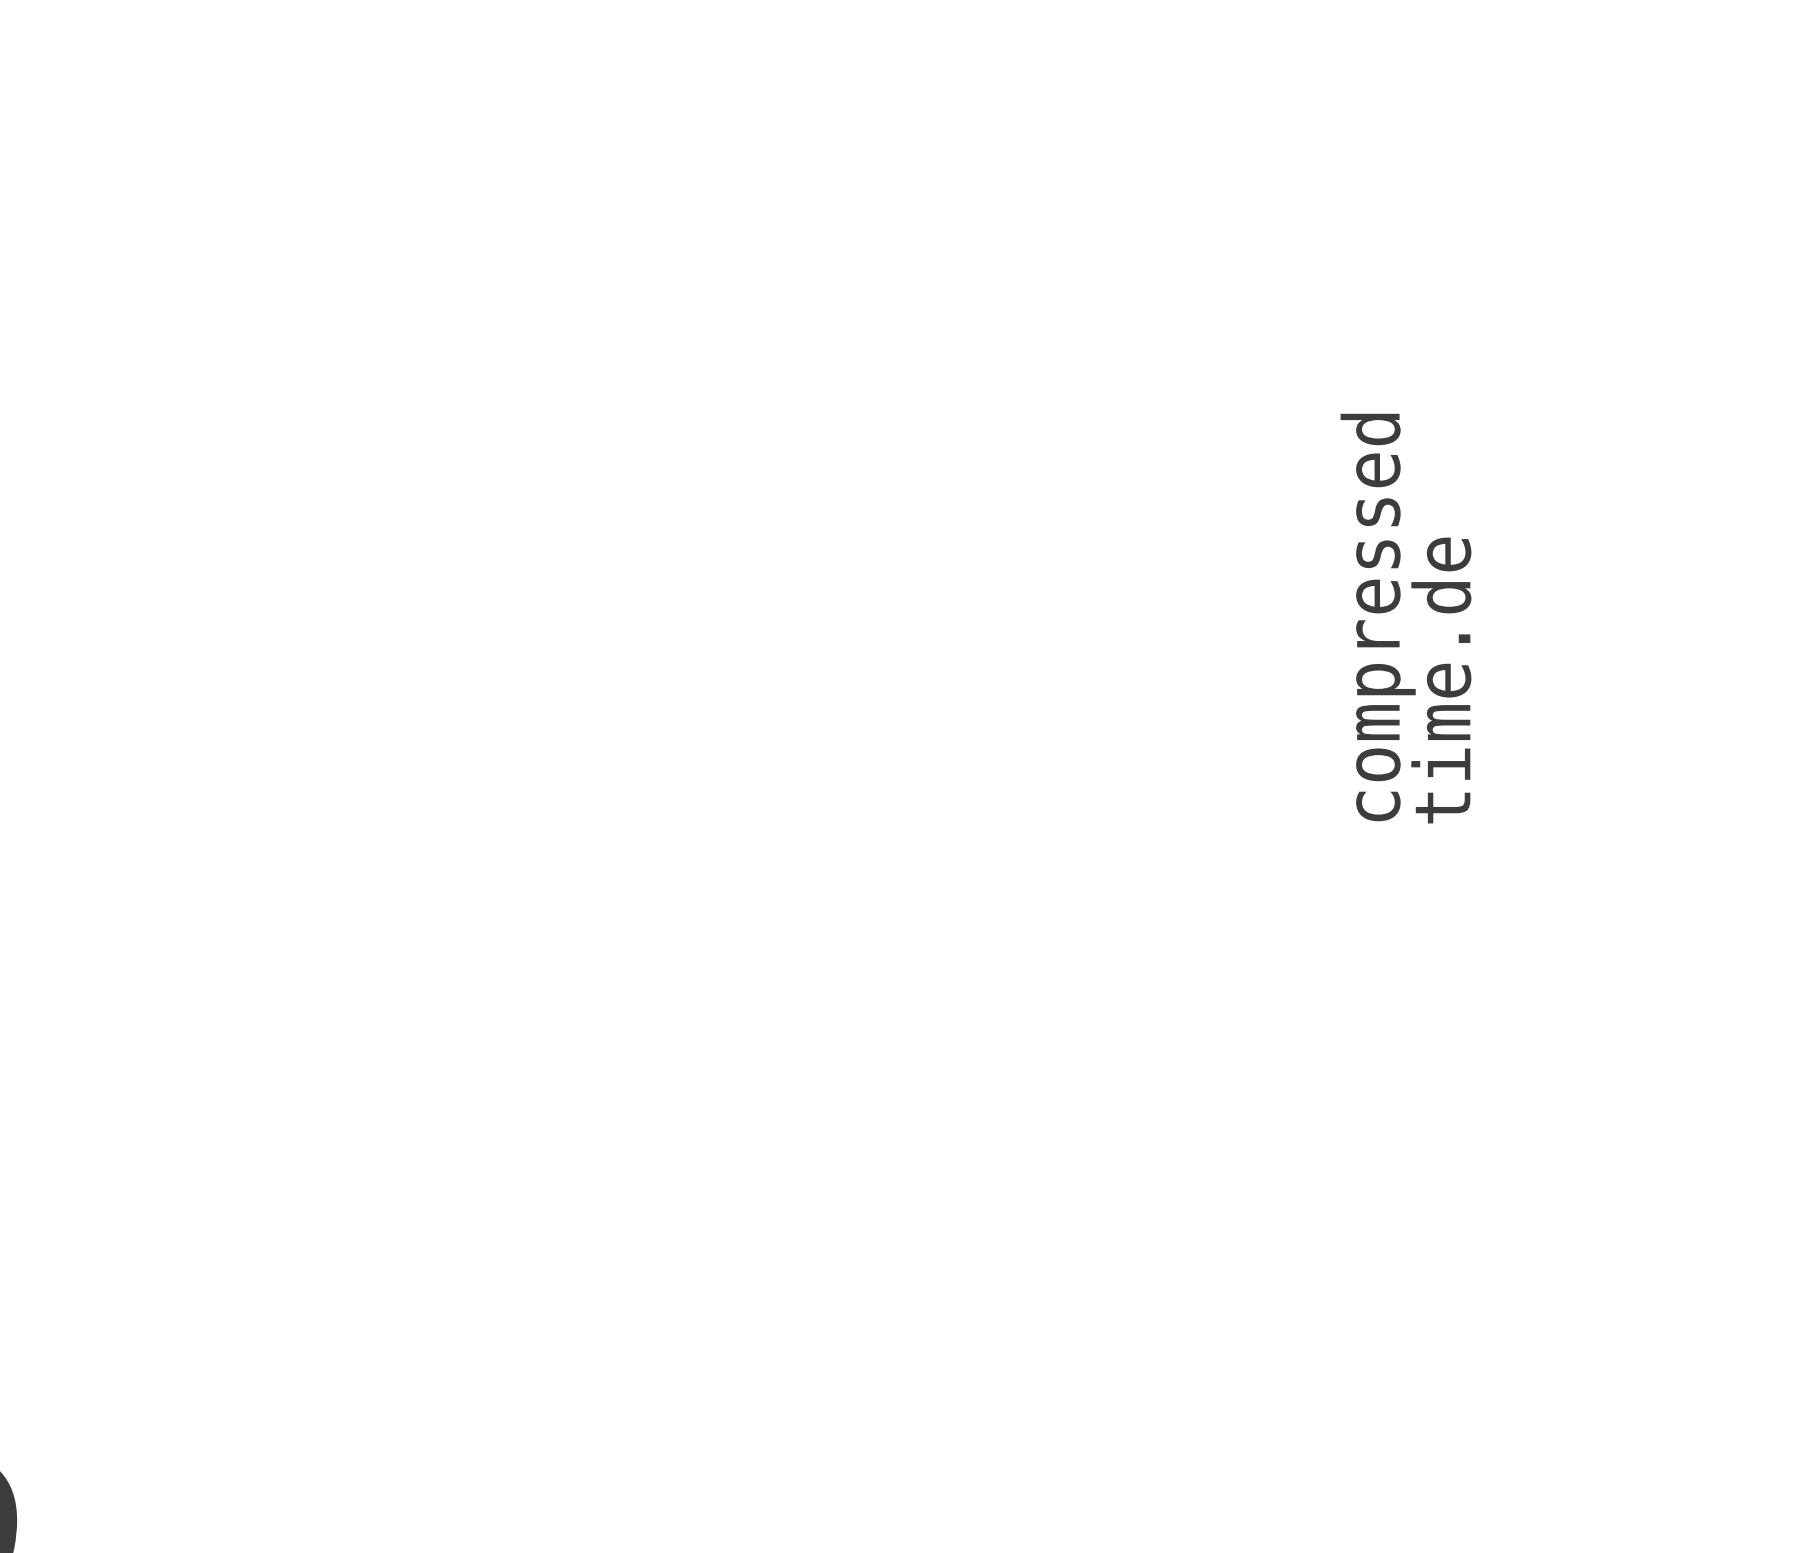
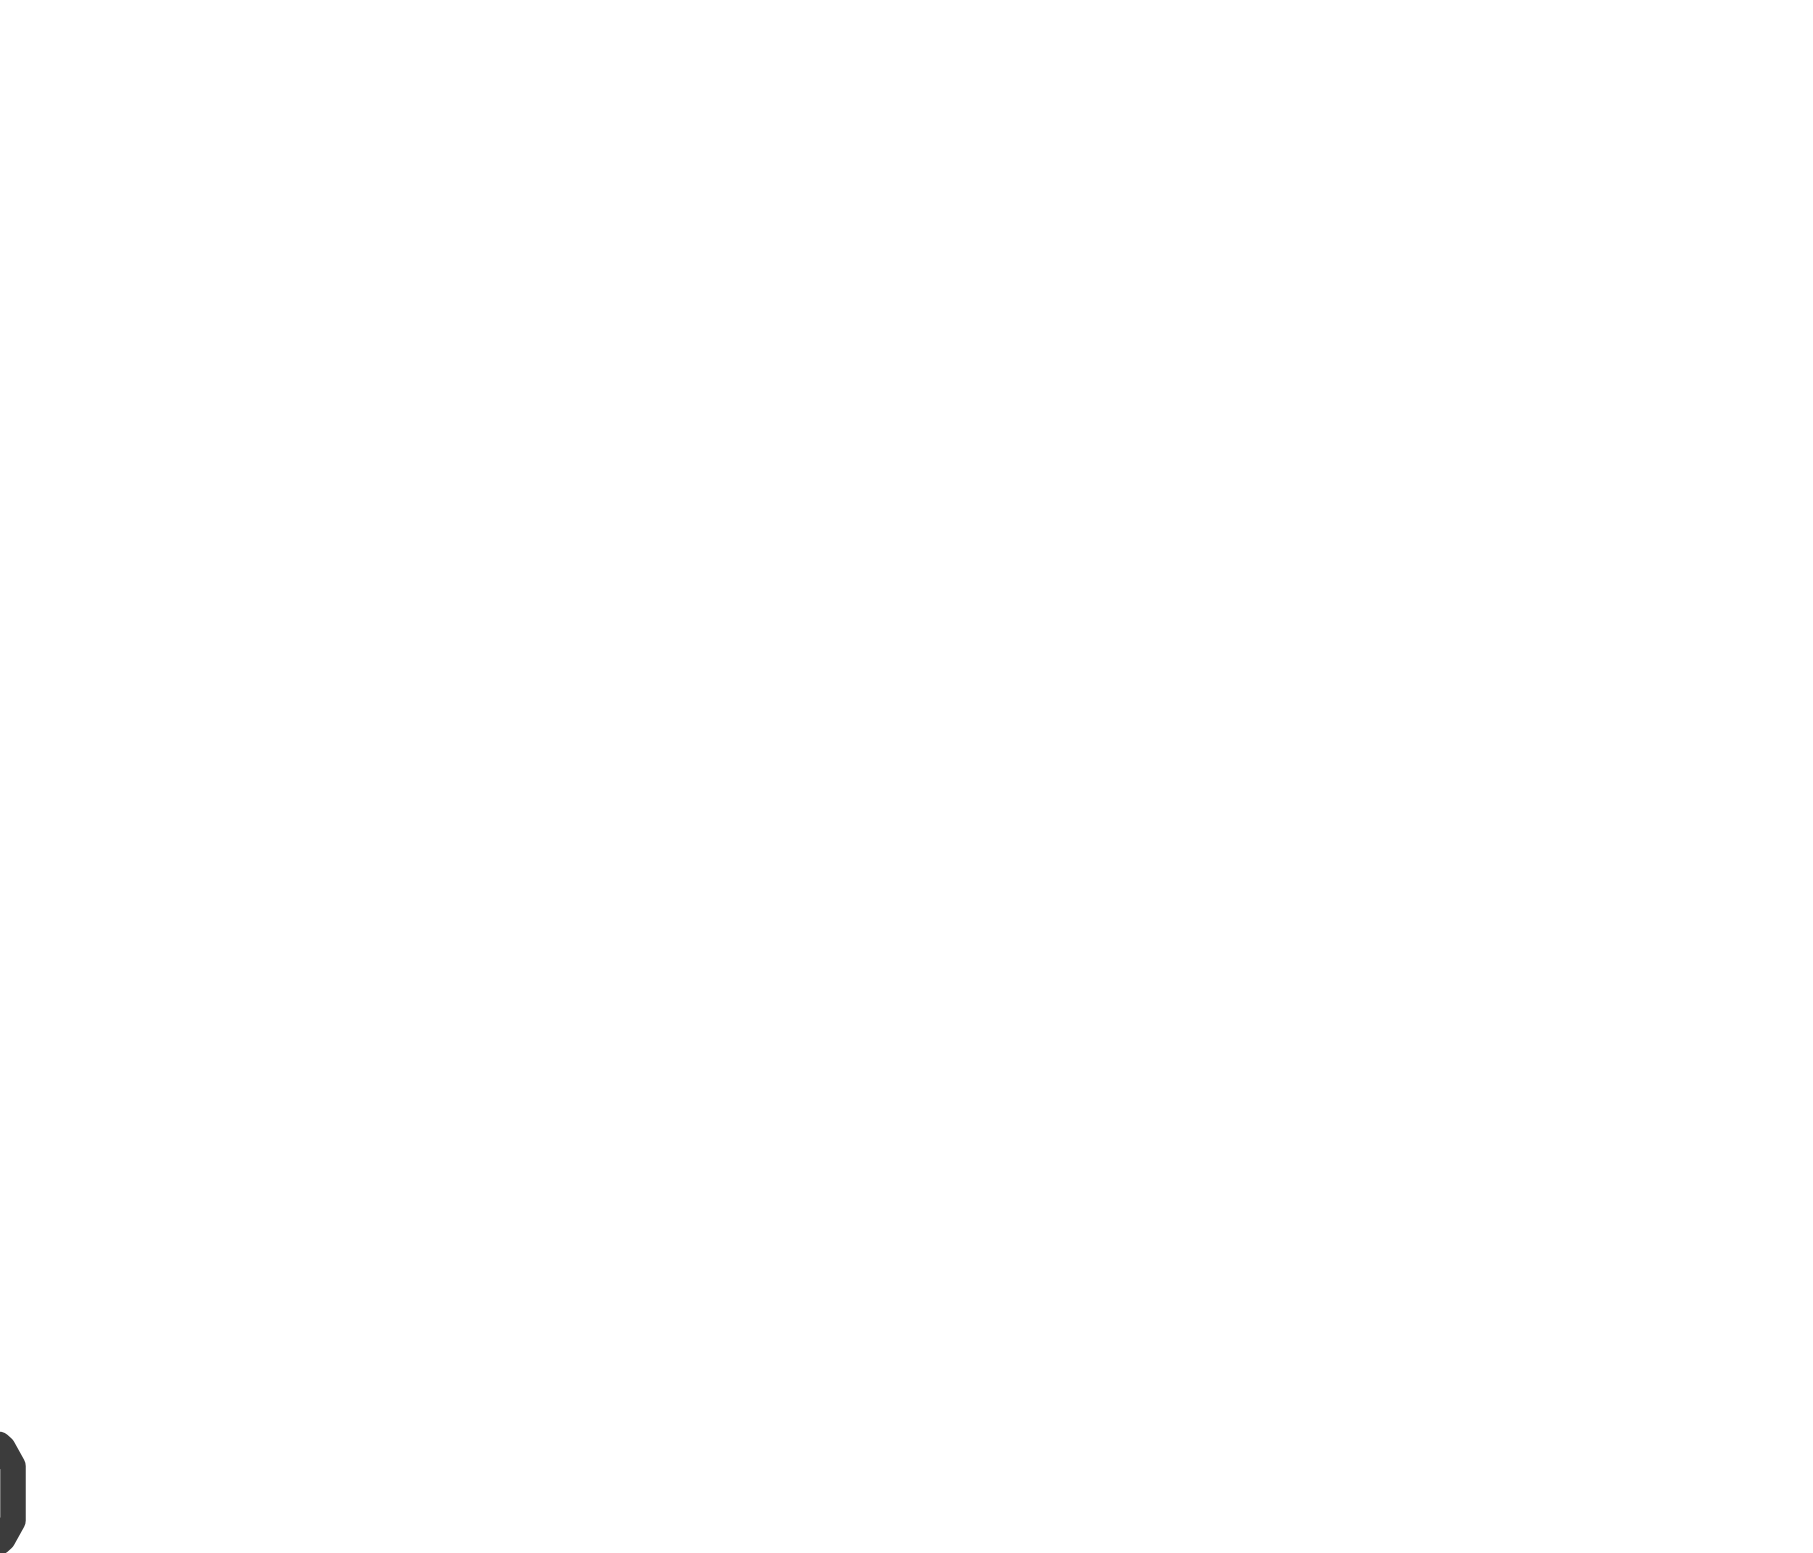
text: compressed (1378, 617) -> none
text: time.de (1441, 680) -> none

